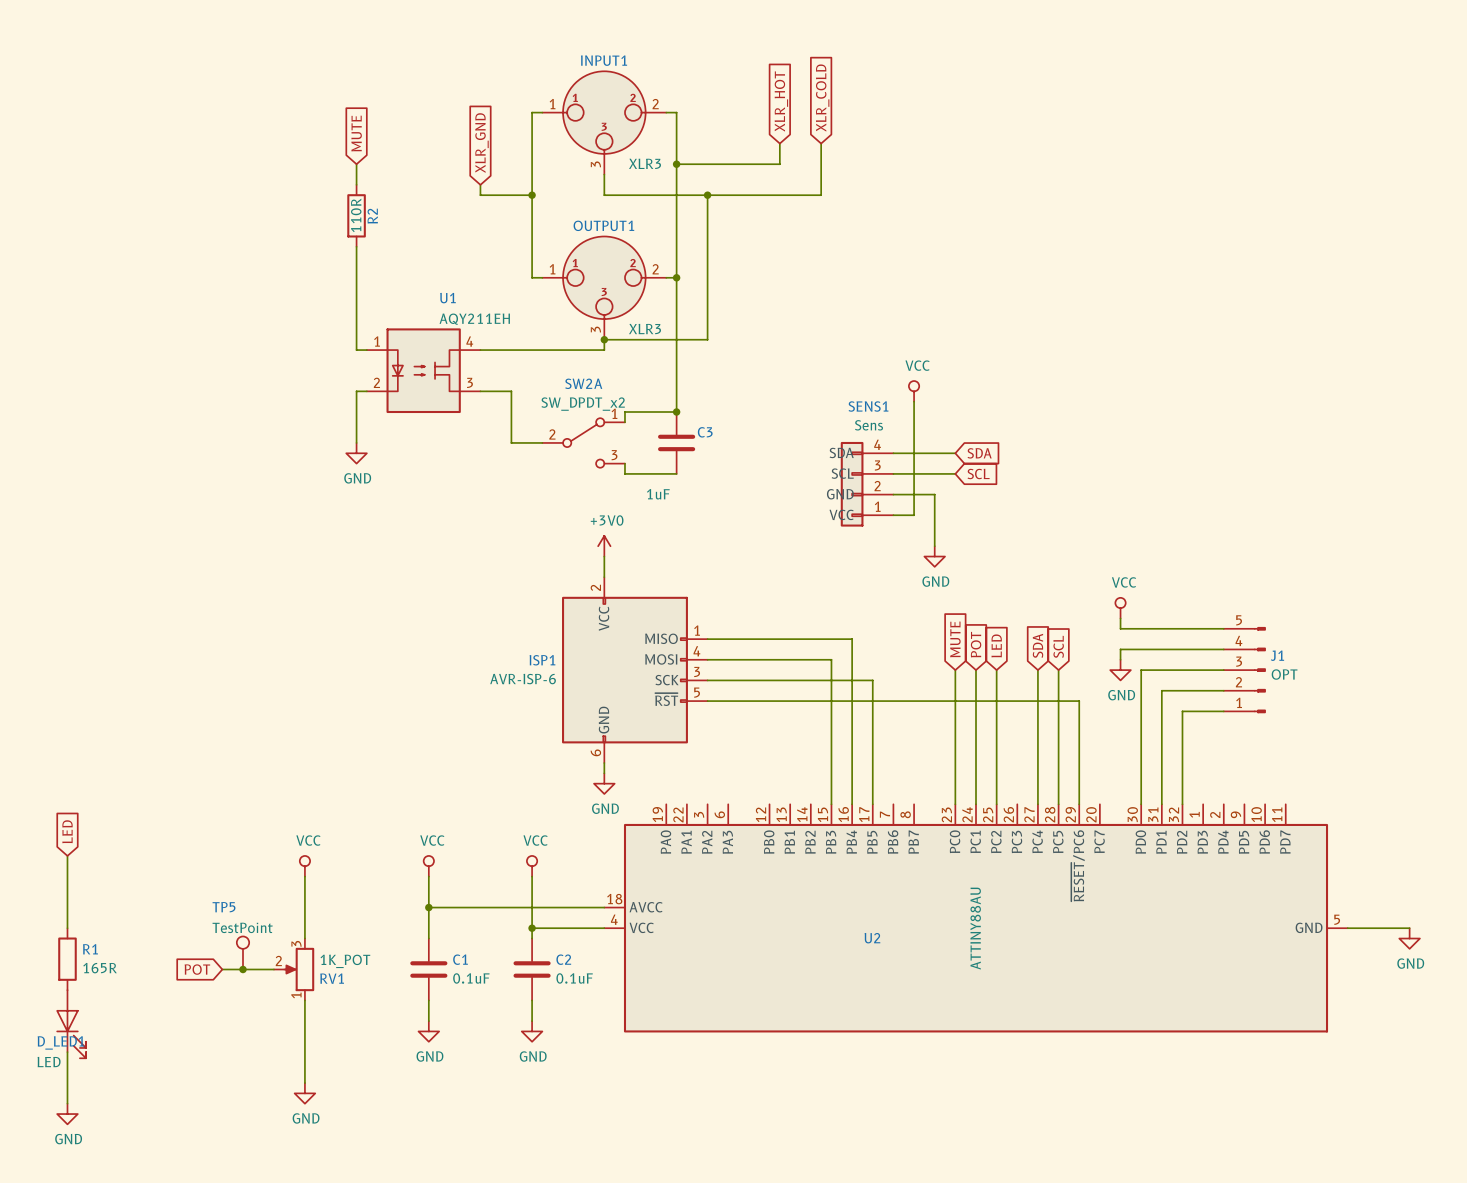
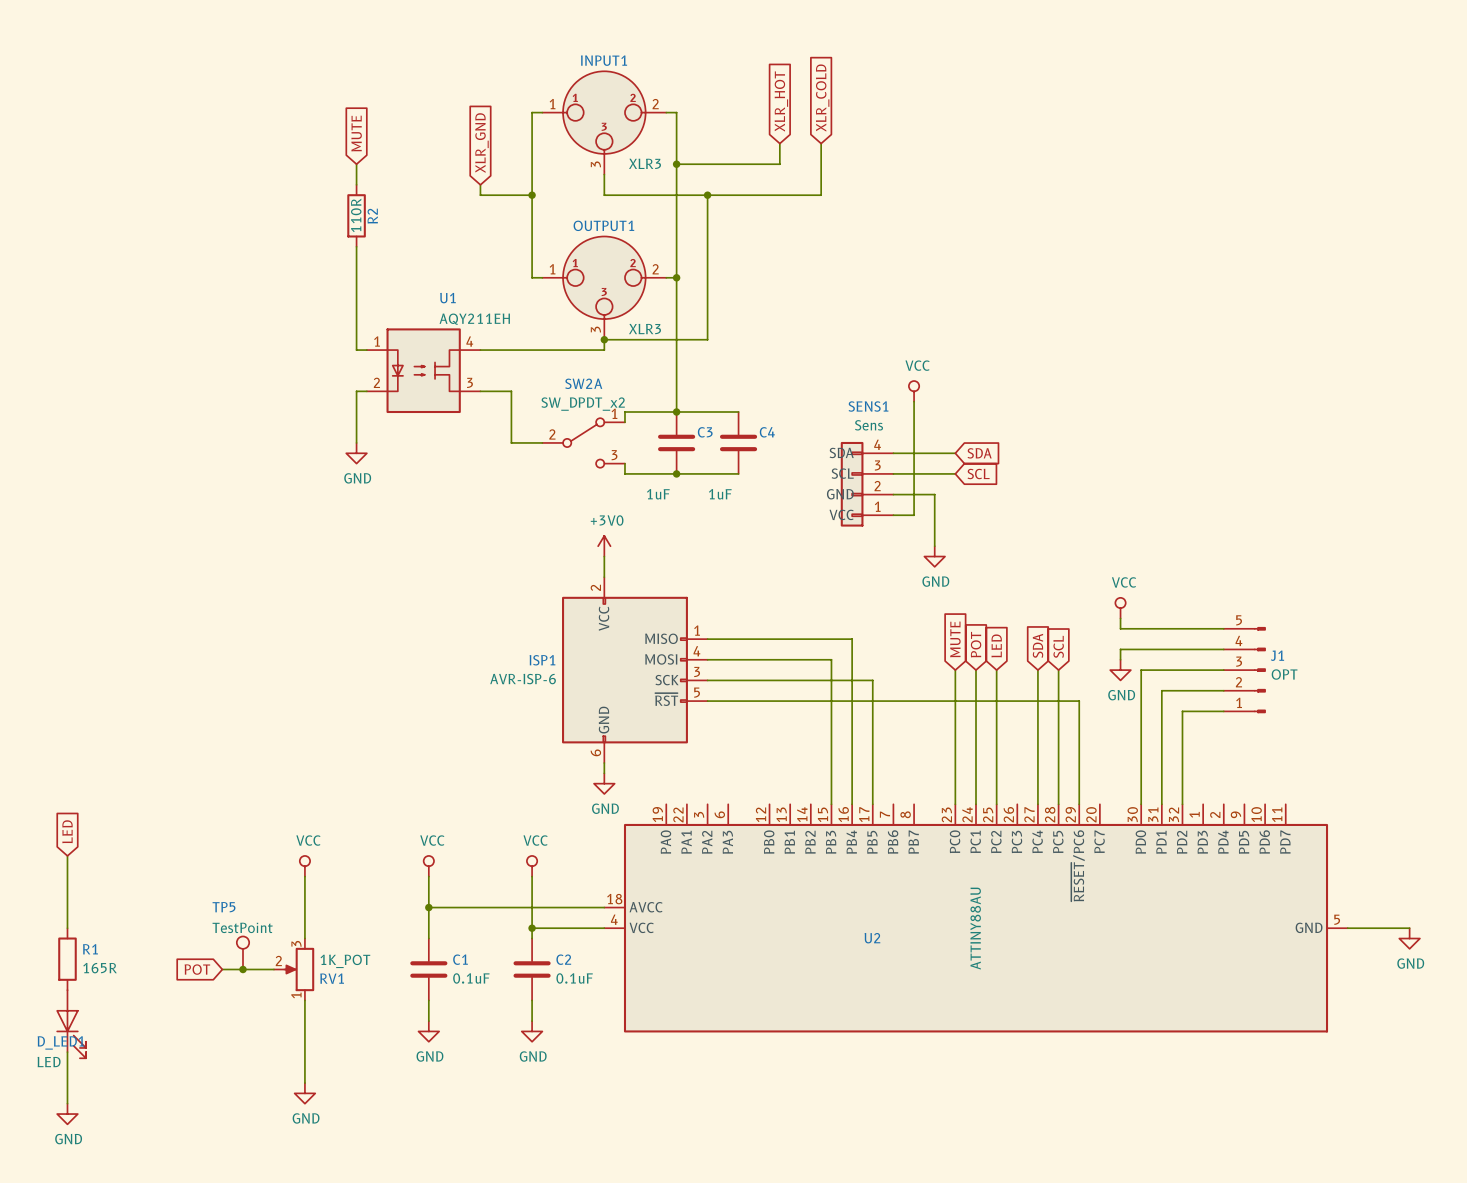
wire: none -> (676, 412) (738, 412)
C4: none -> 1uF (738, 442)
wire: none -> (676, 473) (738, 473)
junction: none -> (676, 473)

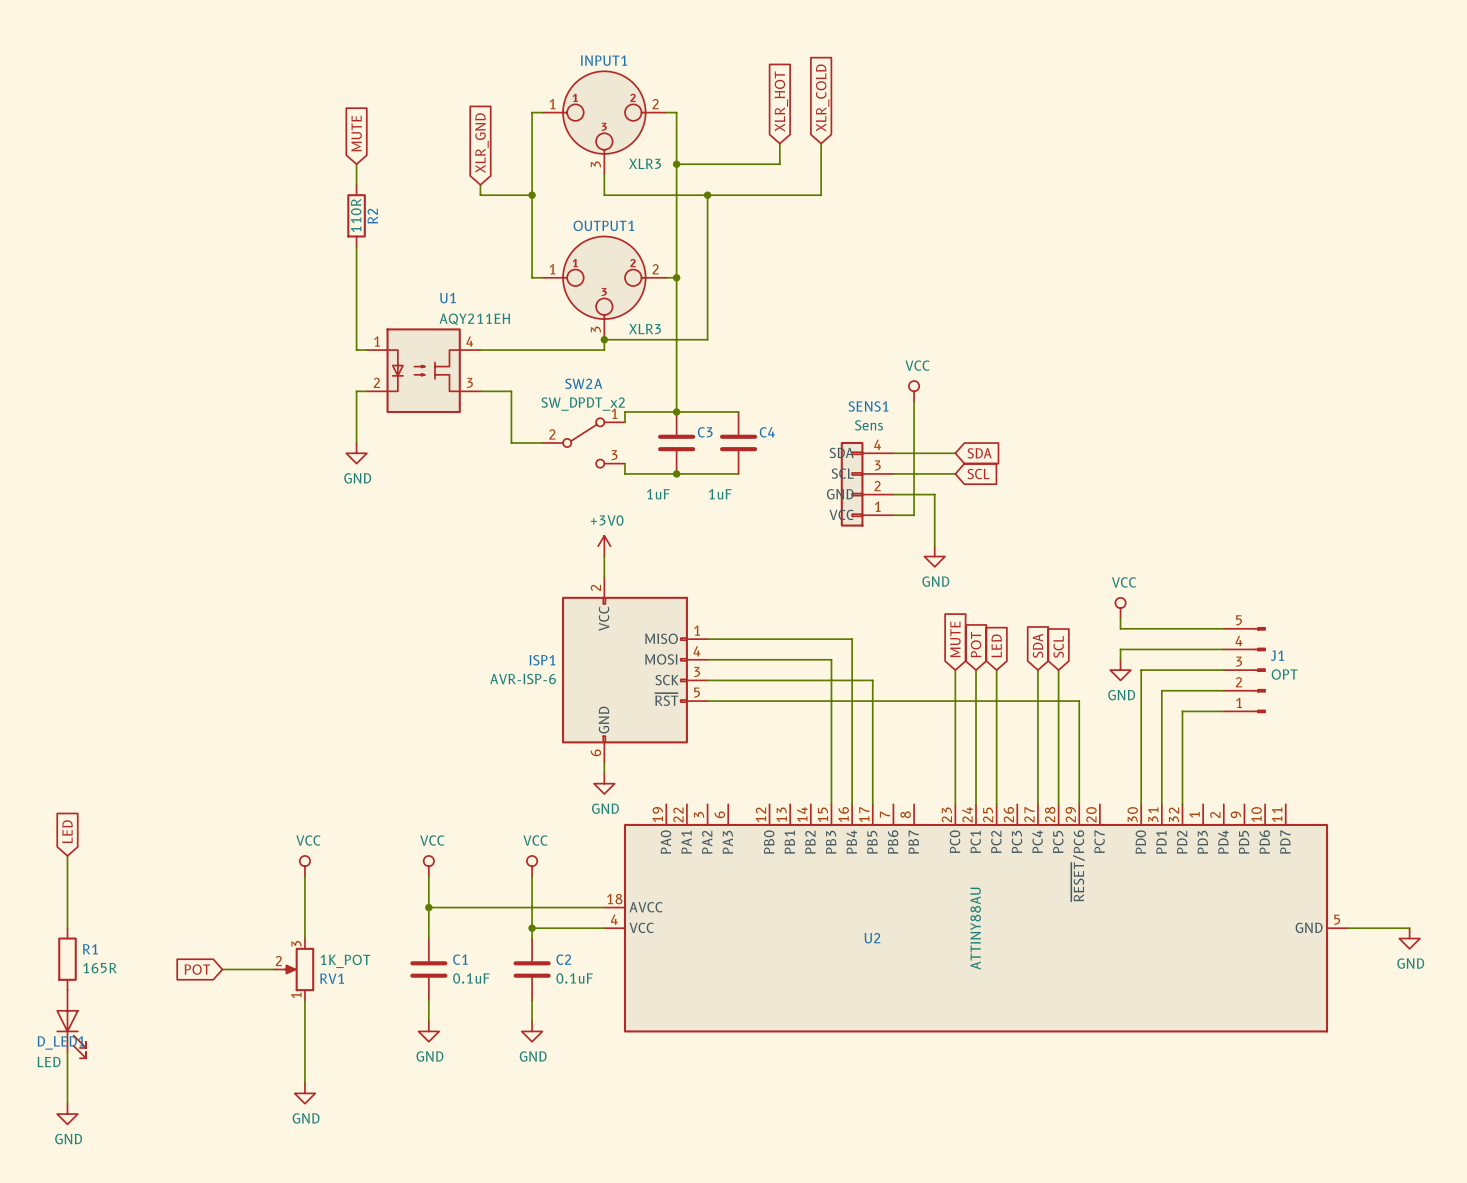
TP5: TestPoint (242, 952) -> none
junction: (242, 969) -> none

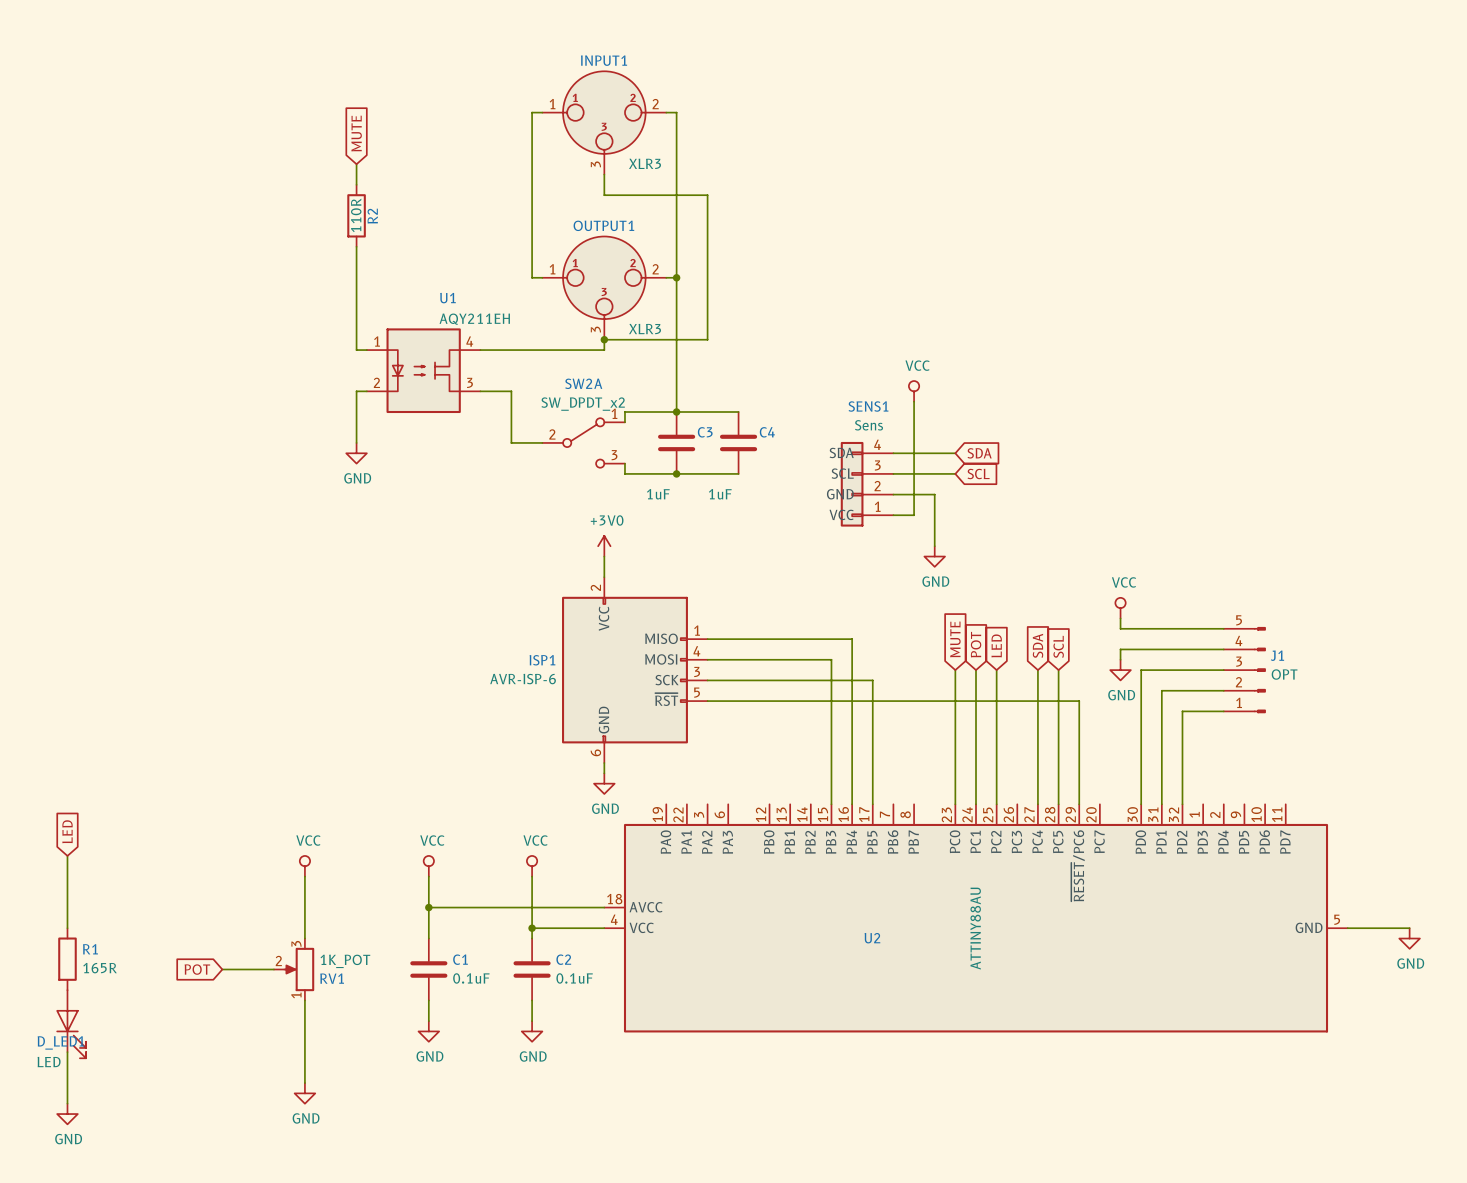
global label: XLR_COLD (822, 98) -> none
global label: XLR_HOT (781, 101) -> none
global label: XLR_GND (481, 143) -> none
wire: (779, 143) (779, 164) (676, 164) -> none
wire: (821, 143) (821, 195) (707, 195) -> none
junction: (676, 164) -> none
wire: (480, 184) (480, 195) (532, 195) -> none
junction: (532, 195) -> none
junction: (707, 195) -> none

